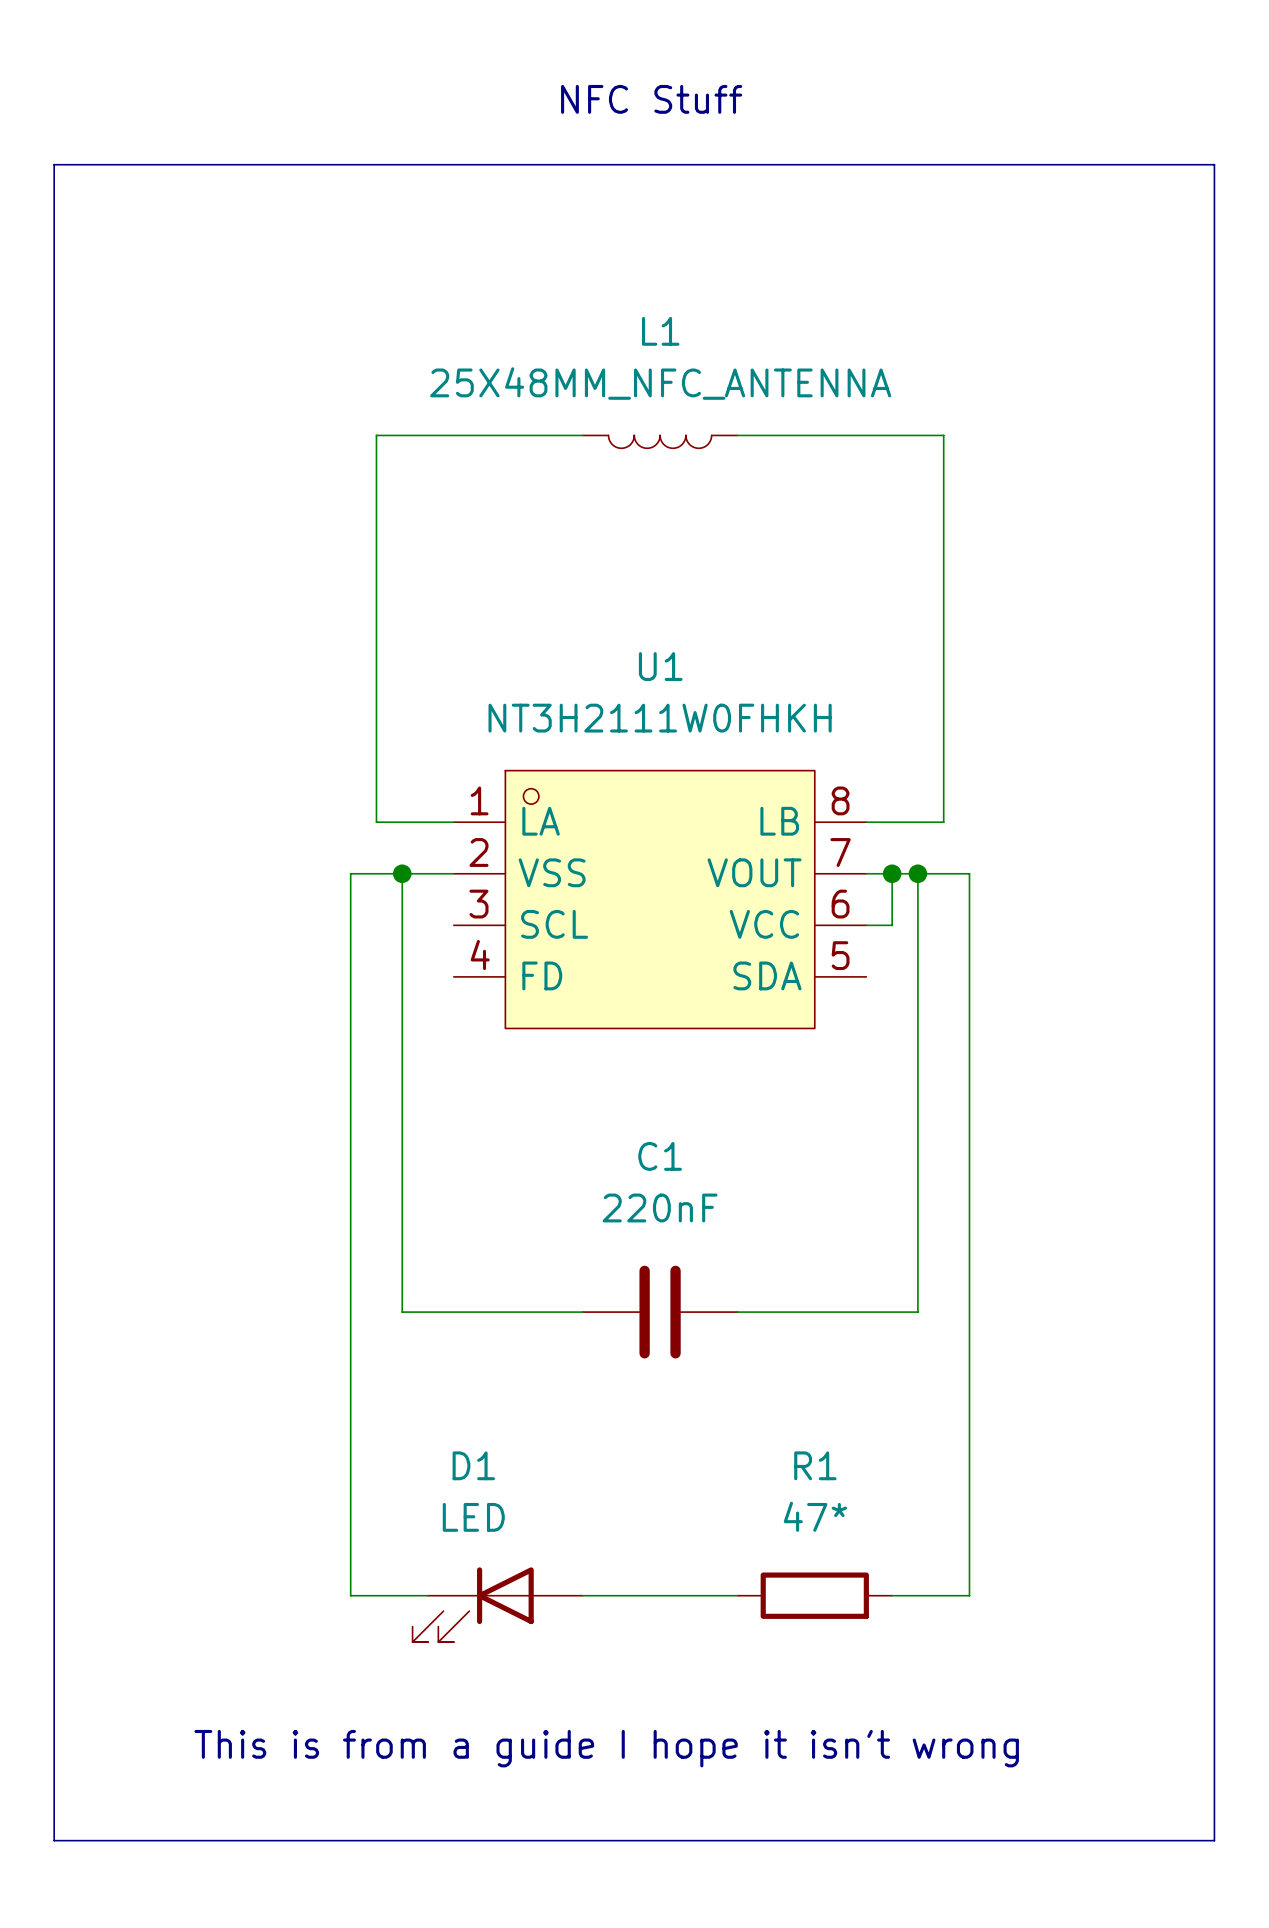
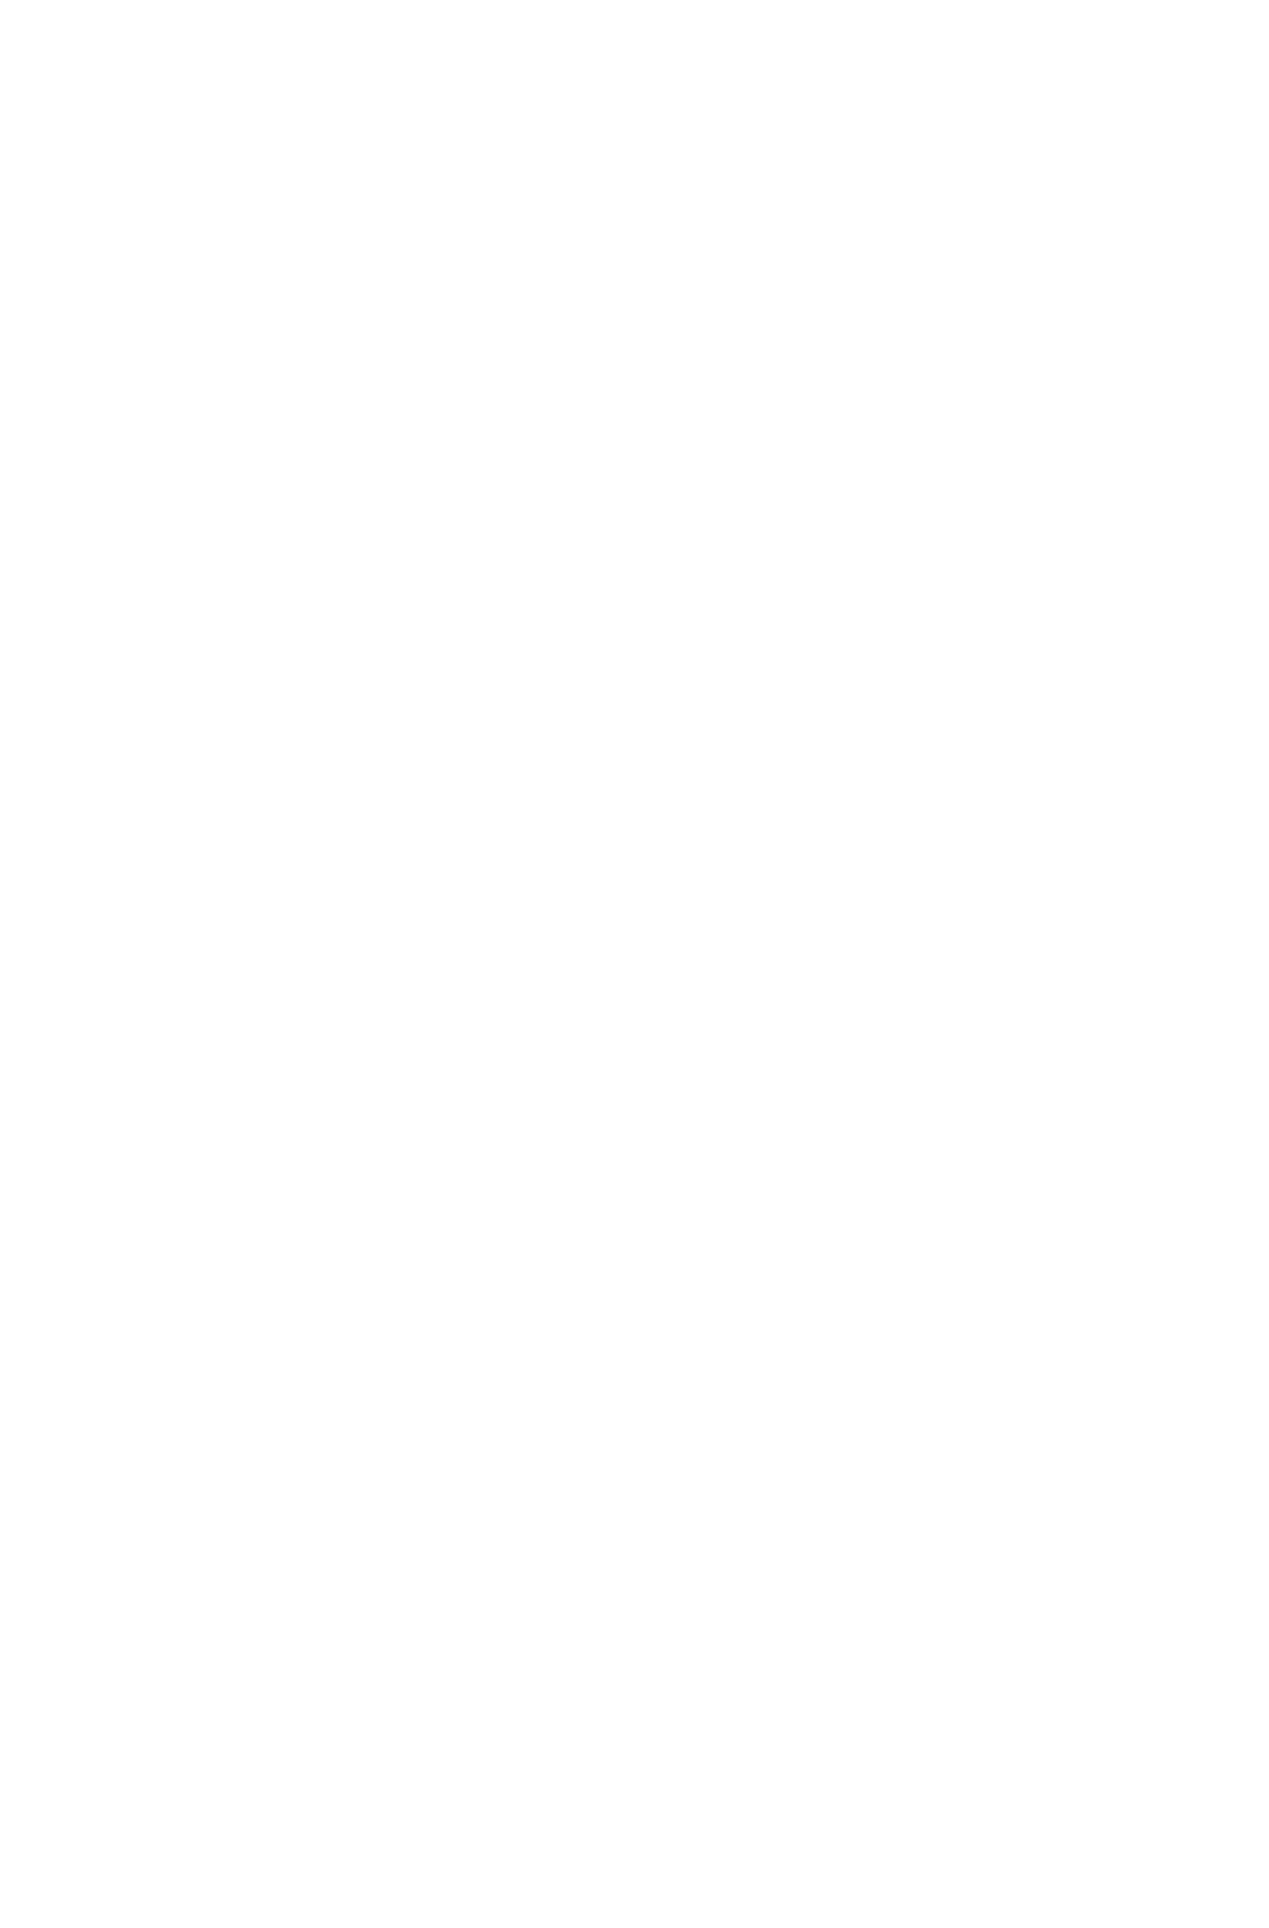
text: NFC Stuff (651, 99) -> none
line: (54, 164) (1214, 164) (1214, 1840) (54, 1840) (54, 164) -> none
wire: (582, 435) (376, 435) (376, 822) (453, 822) -> none
wire: (737, 435) (943, 435) (943, 822) (866, 822) -> none
L1: 25X48MM_NFC_ANTENNA (660, 441) -> none
wire: (402, 873) (402, 1312) (582, 1312) -> none
junction: (402, 873) -> none
wire: (453, 873) (350, 873) (350, 1595) (428, 1595) -> none
wire: (866, 873) (969, 873) (969, 1595) (892, 1595) -> none
wire: (892, 873) (892, 925) (866, 925) -> none
junction: (892, 873) -> none
wire: (917, 873) (917, 1312) (737, 1312) -> none
junction: (917, 873) -> none
U1: NT3H2111W0FHKH (660, 899) -> none
C1: 220nF (660, 1312) -> none
wire: (582, 1595) (737, 1595) -> none
R1: 47* (814, 1595) -> none
D1: LED (497, 1604) -> none
text: This is from a guide I hope it isn't wrong (606, 1748) -> none

